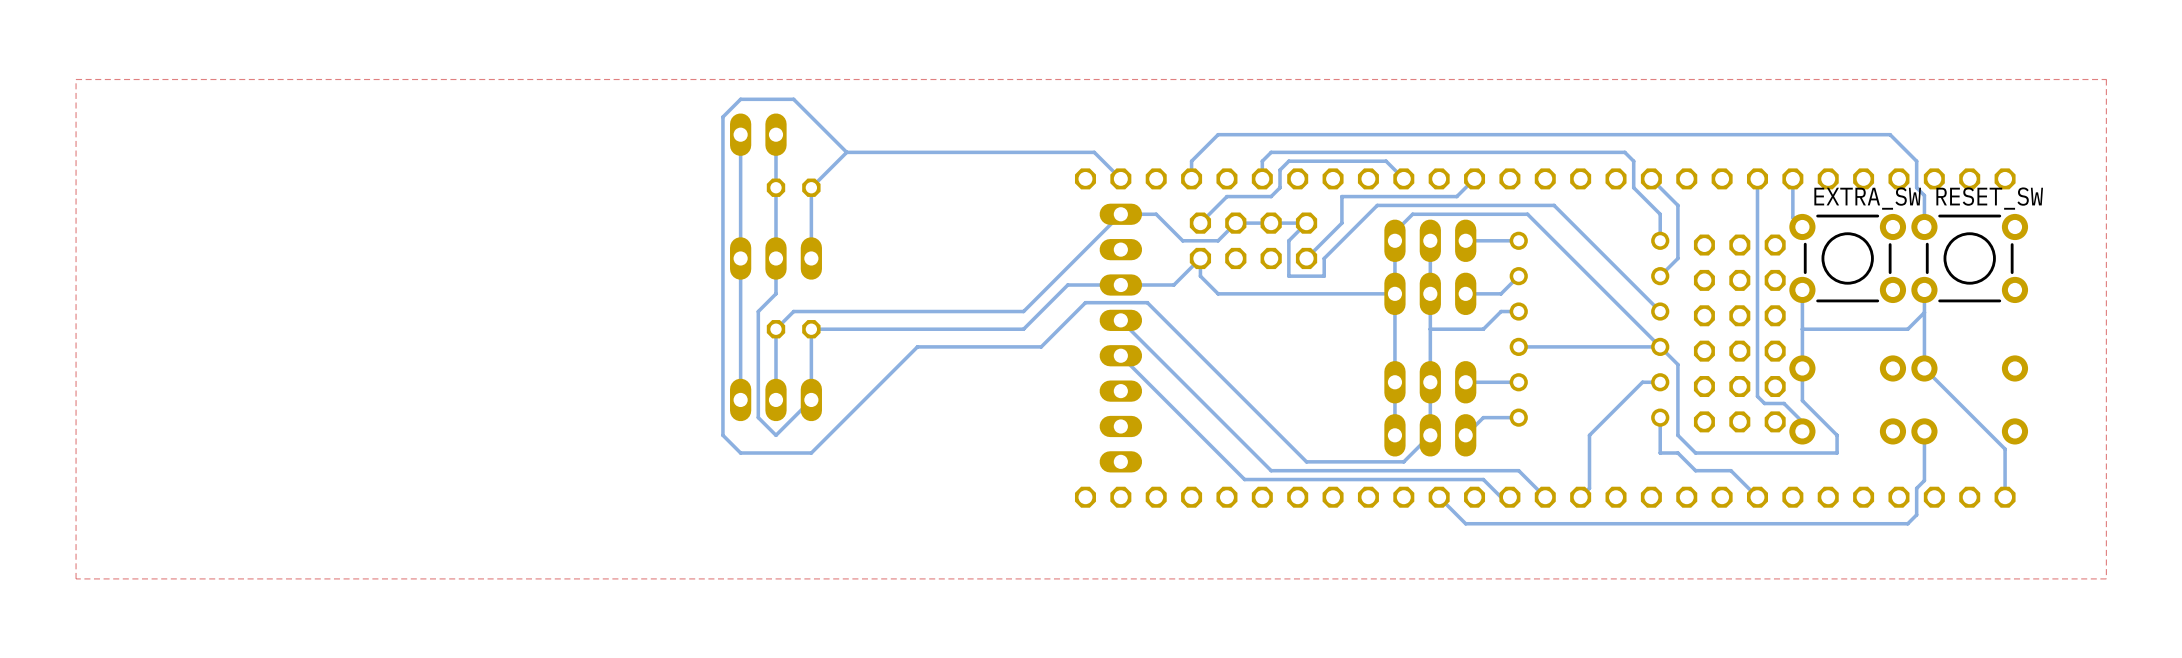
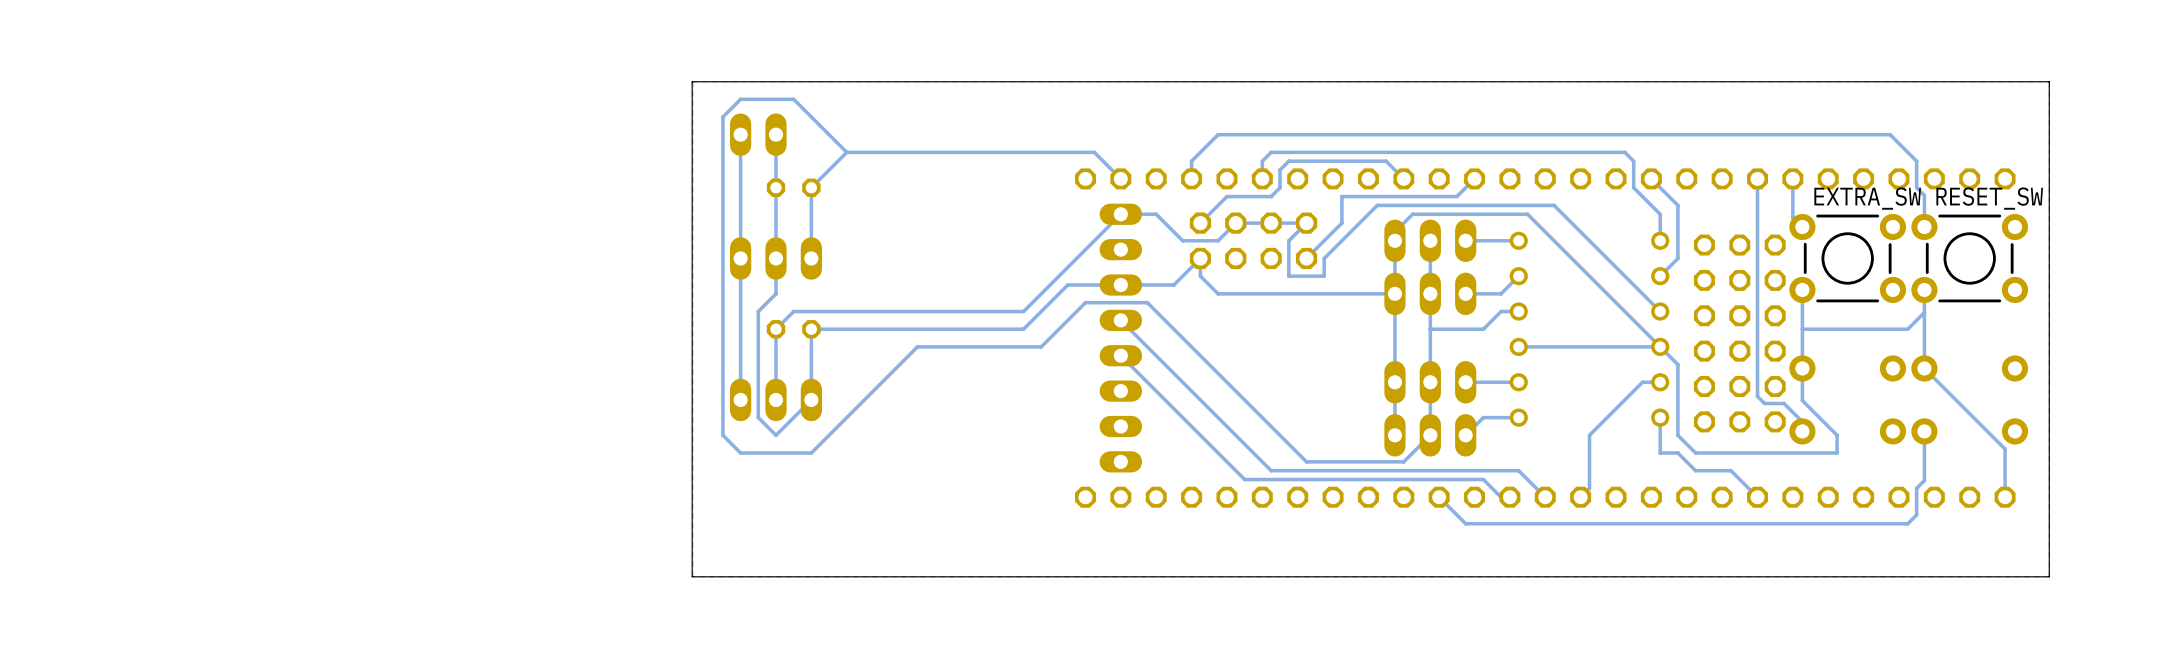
top zone outline: (2106, 79) (76, 79) (76, 578) (2106, 578) (2106, 79) -> none
board edge: none -> (2049, 81) (692, 81) (692, 576) (2049, 576) (2049, 81)

